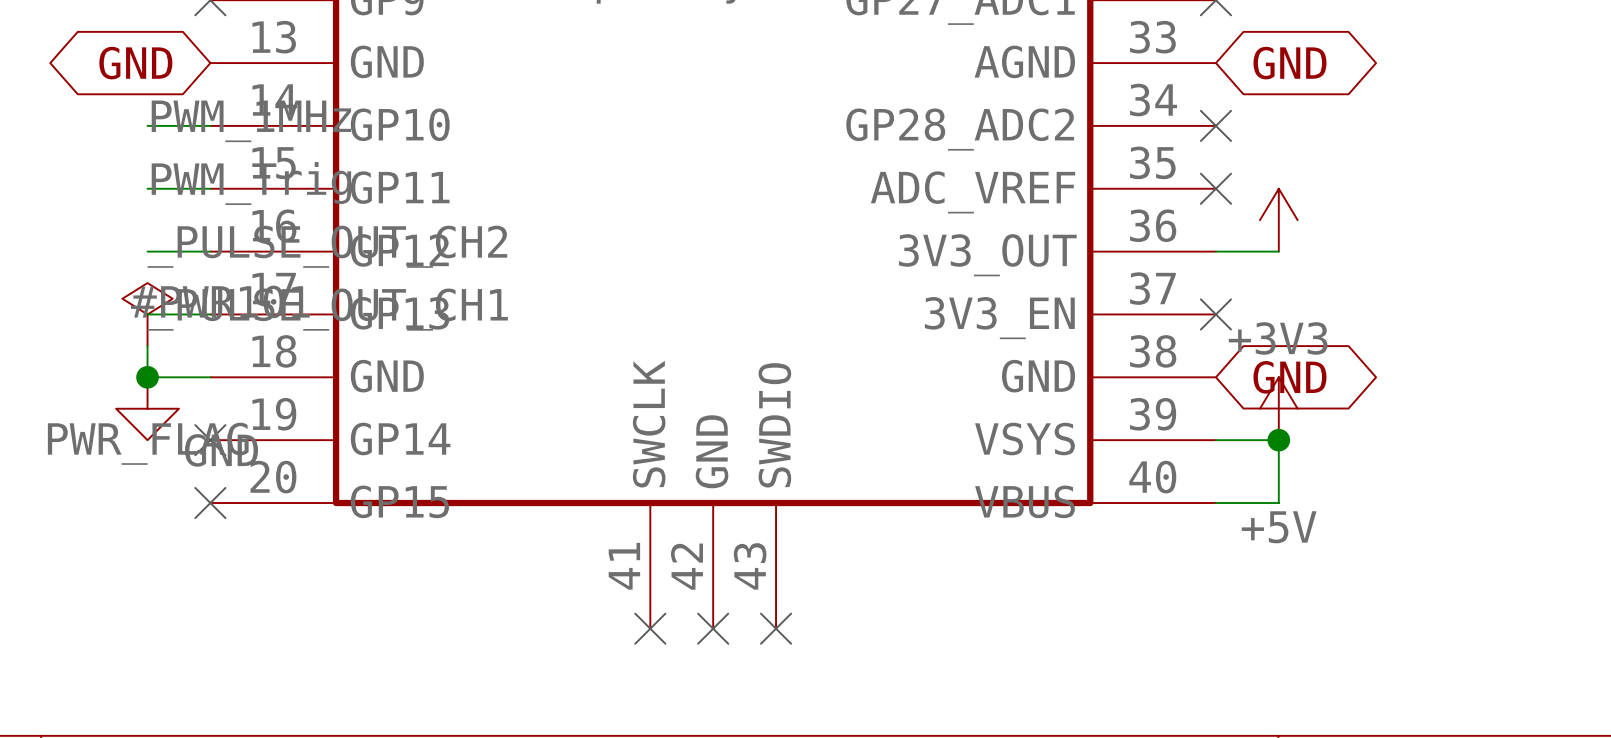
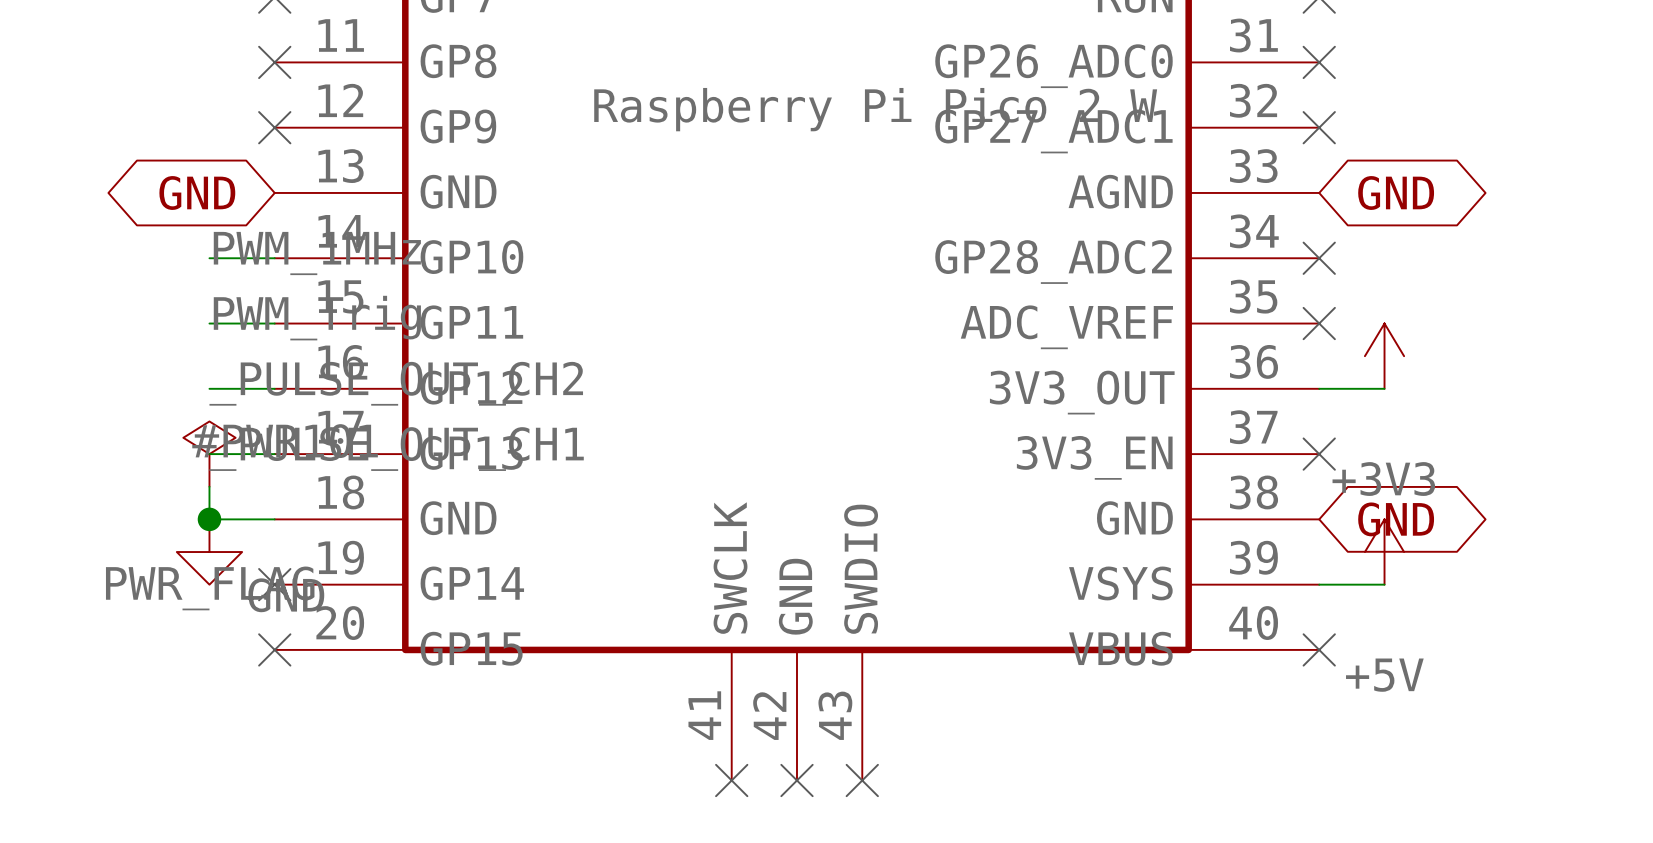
wire: (1278, 440) (1278, 503) (1215, 503) -> none
junction: (1278, 440) -> none
no-connect mark: none -> (1319, 649)

